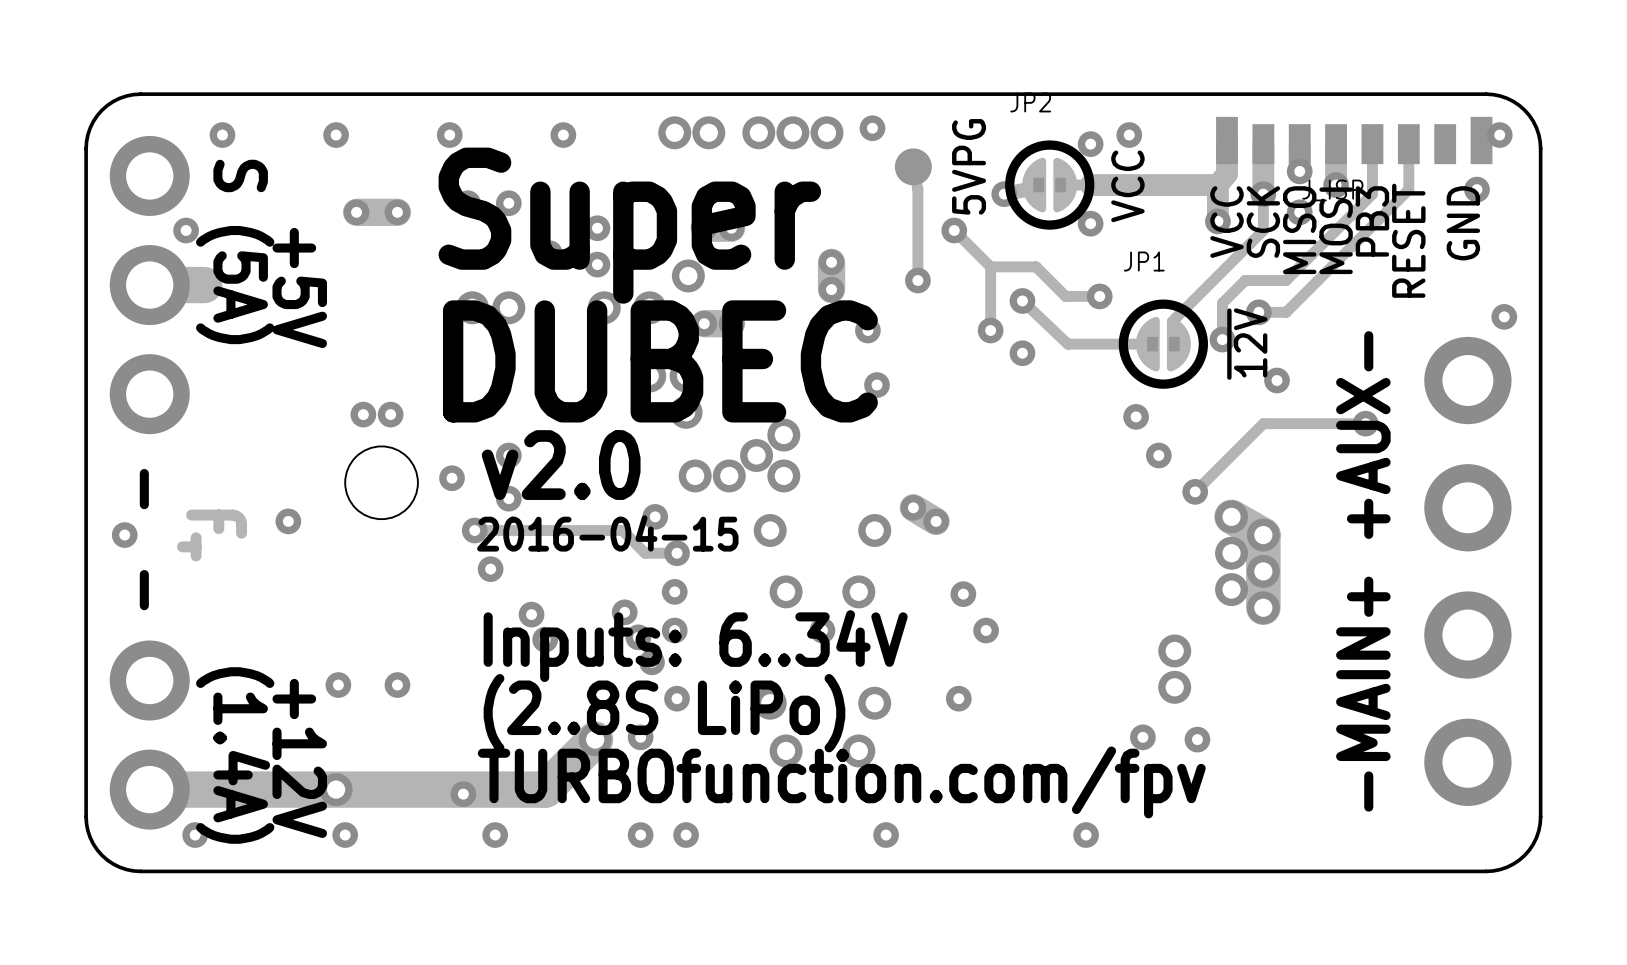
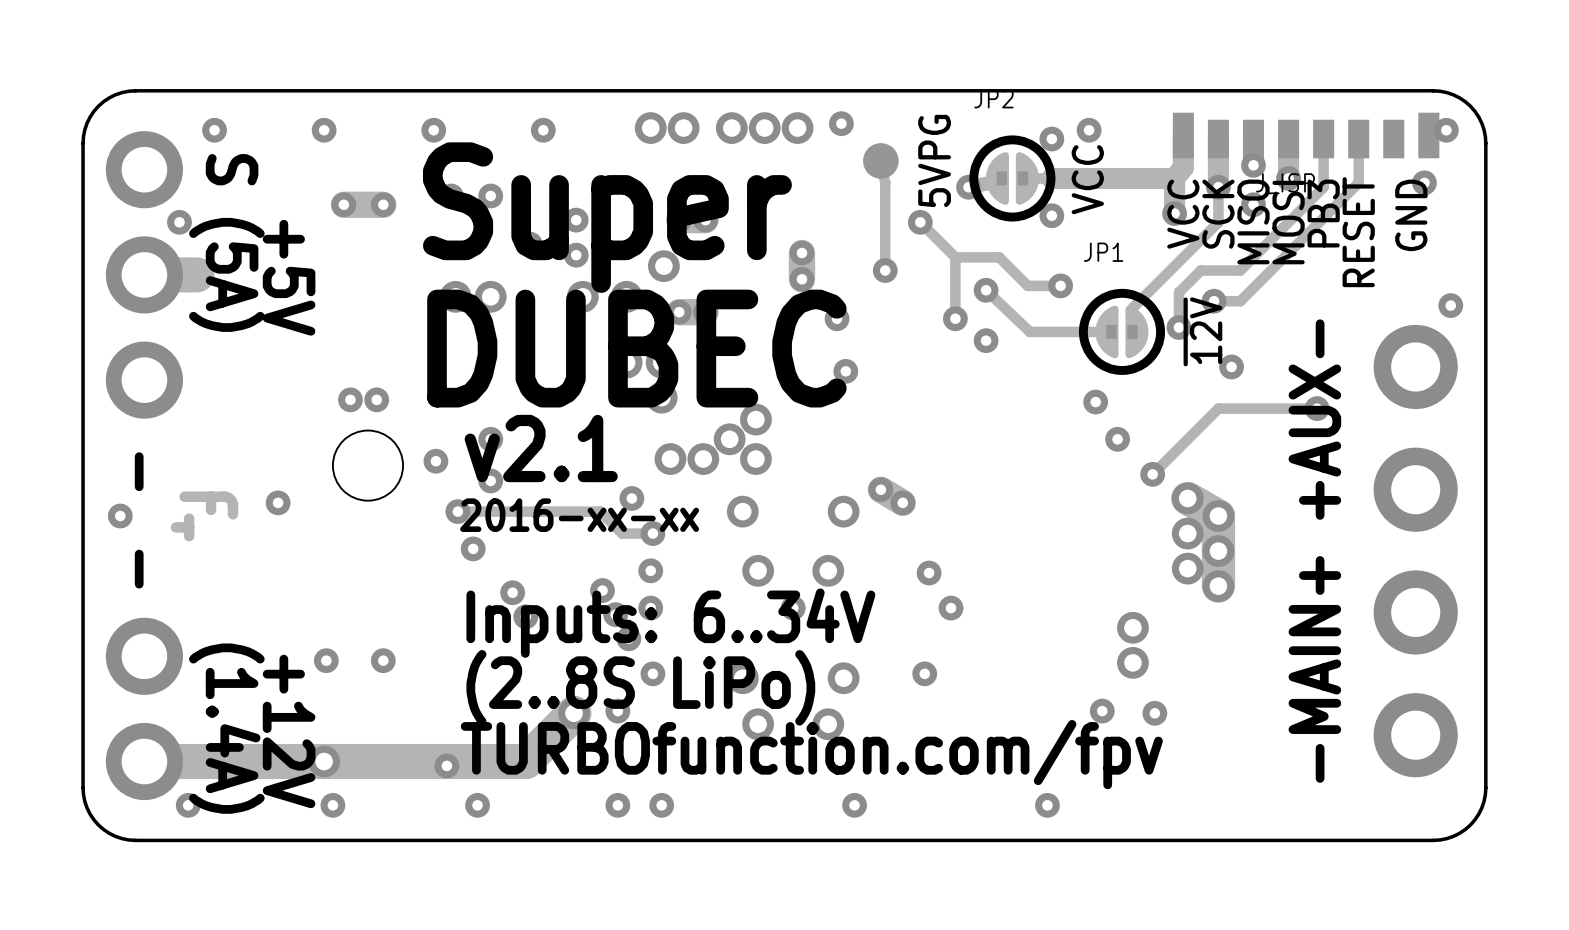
text: v2.0 (561, 465) -> v2.1 (541, 448)
text: 2016-04-15 (607, 533) -> 2016-xx-xx (579, 515)

